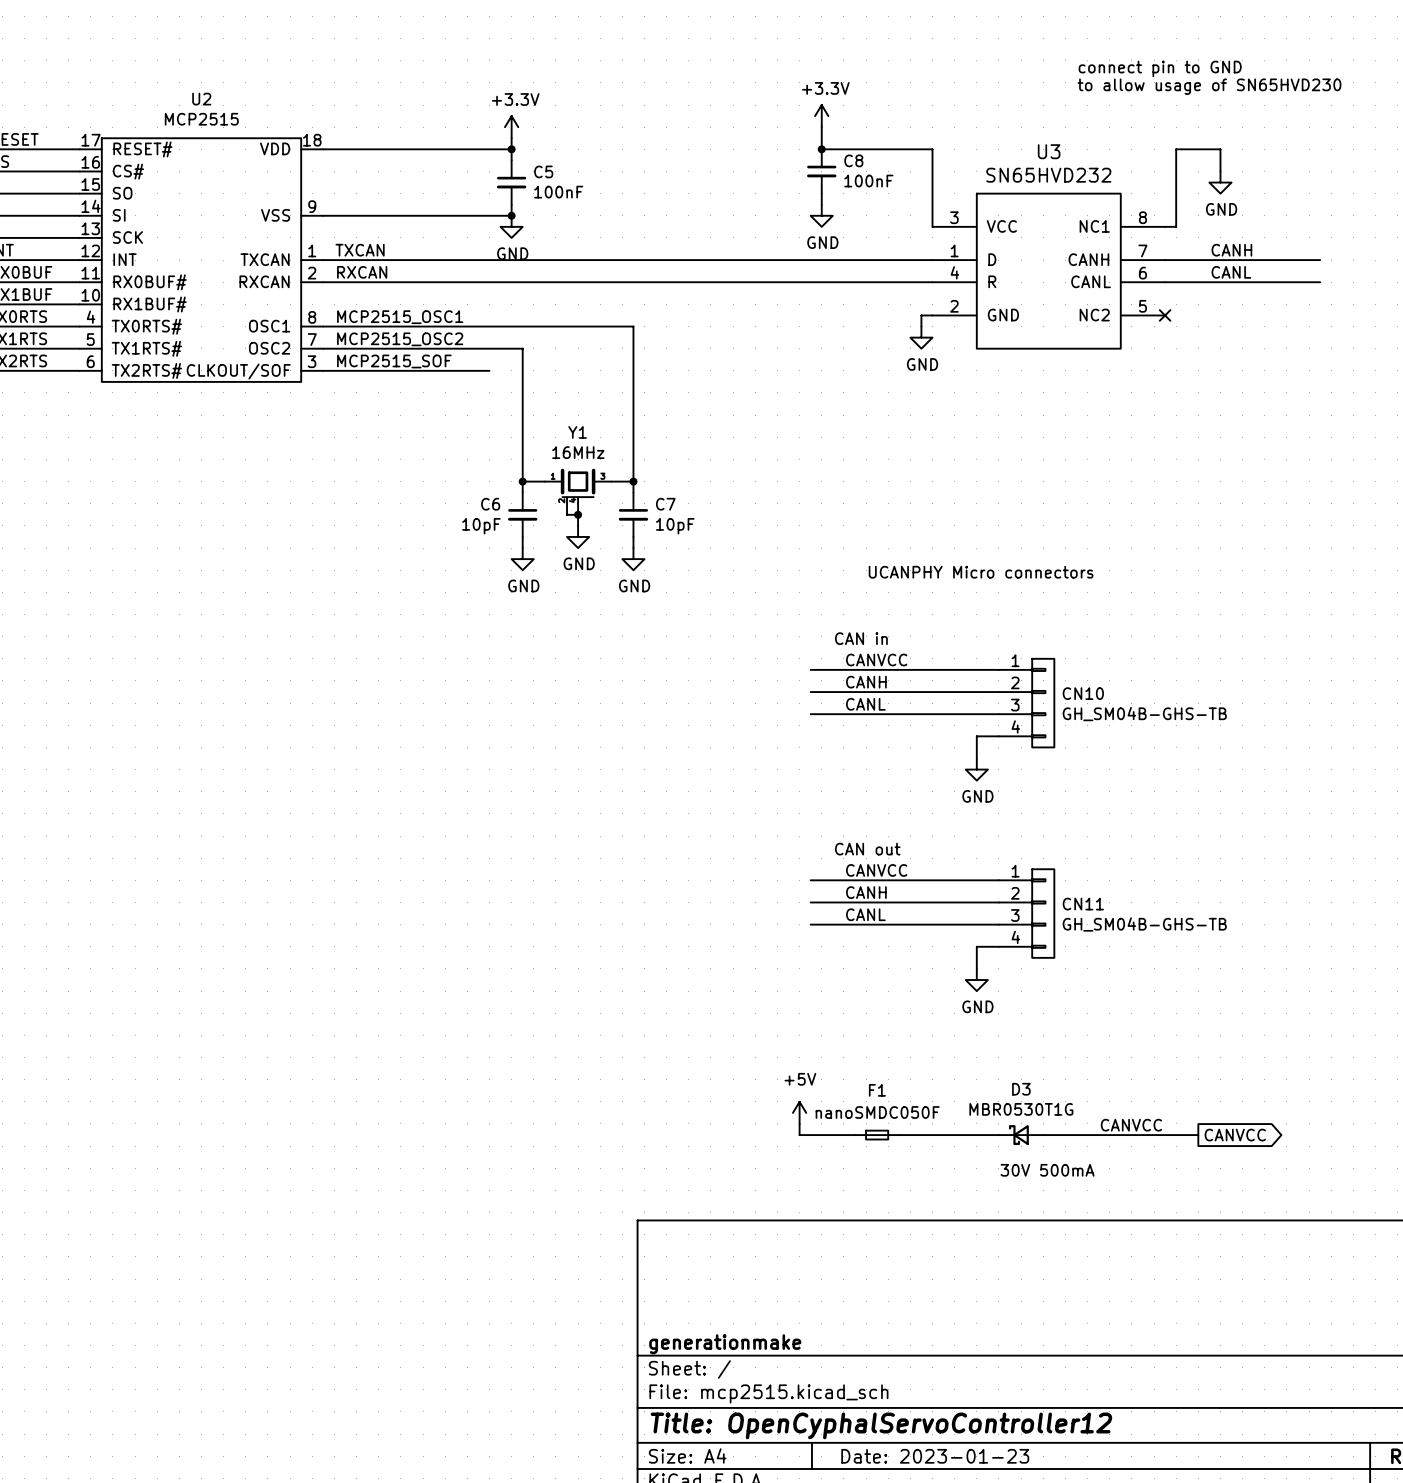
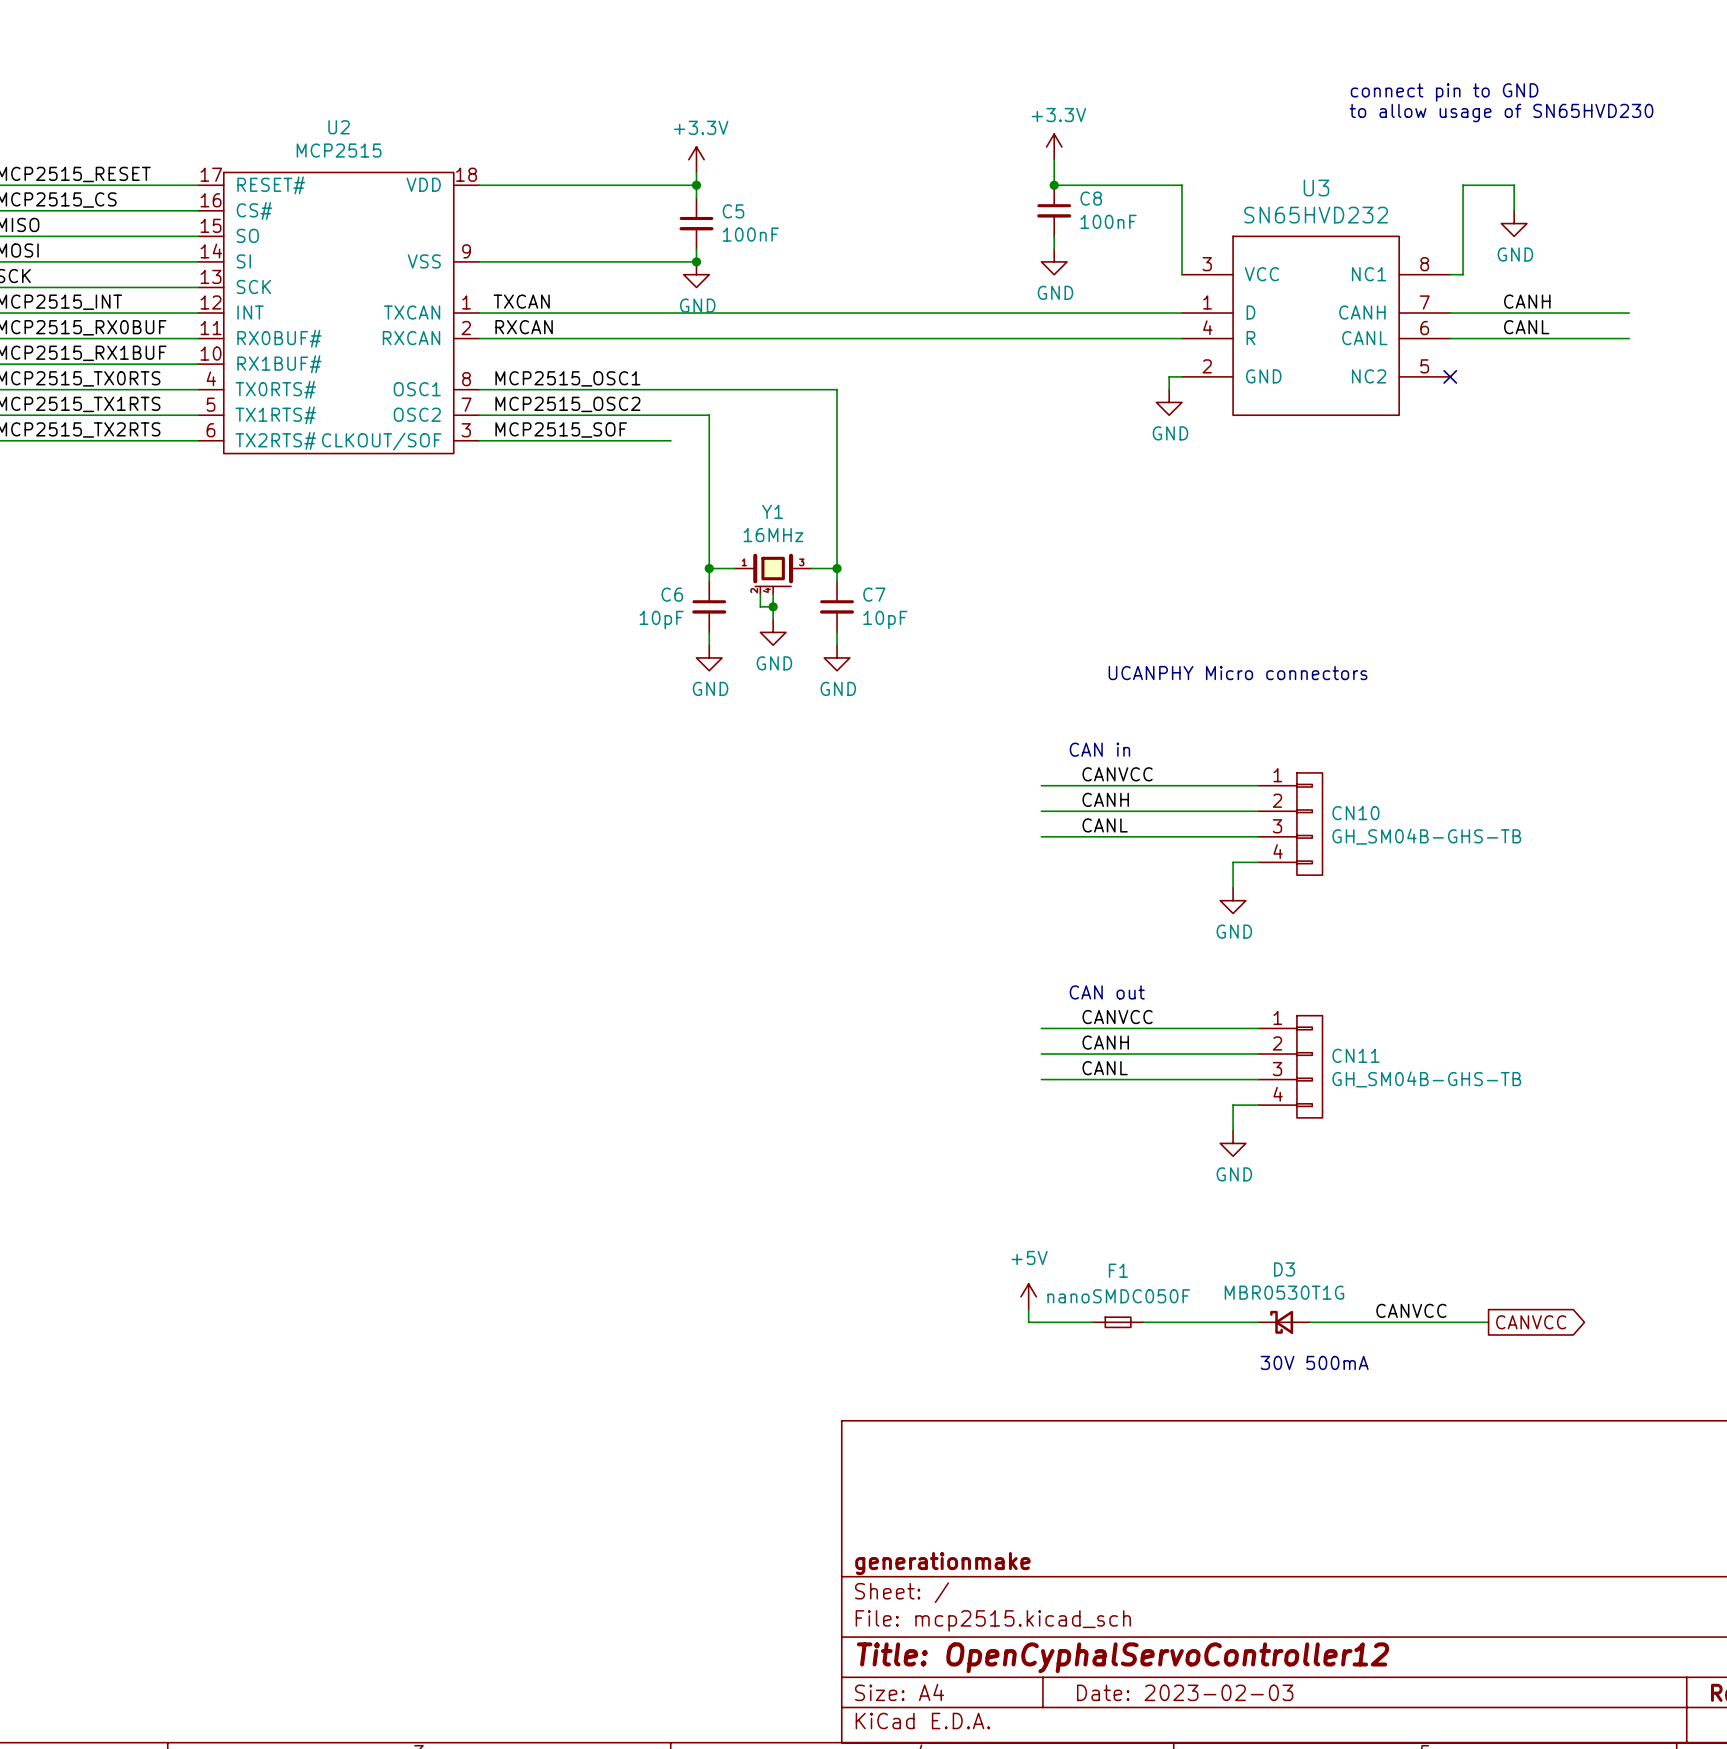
title block: Date: 2023-01-23 (935, 1456) -> Date: 2023-02-03 (1185, 1692)

